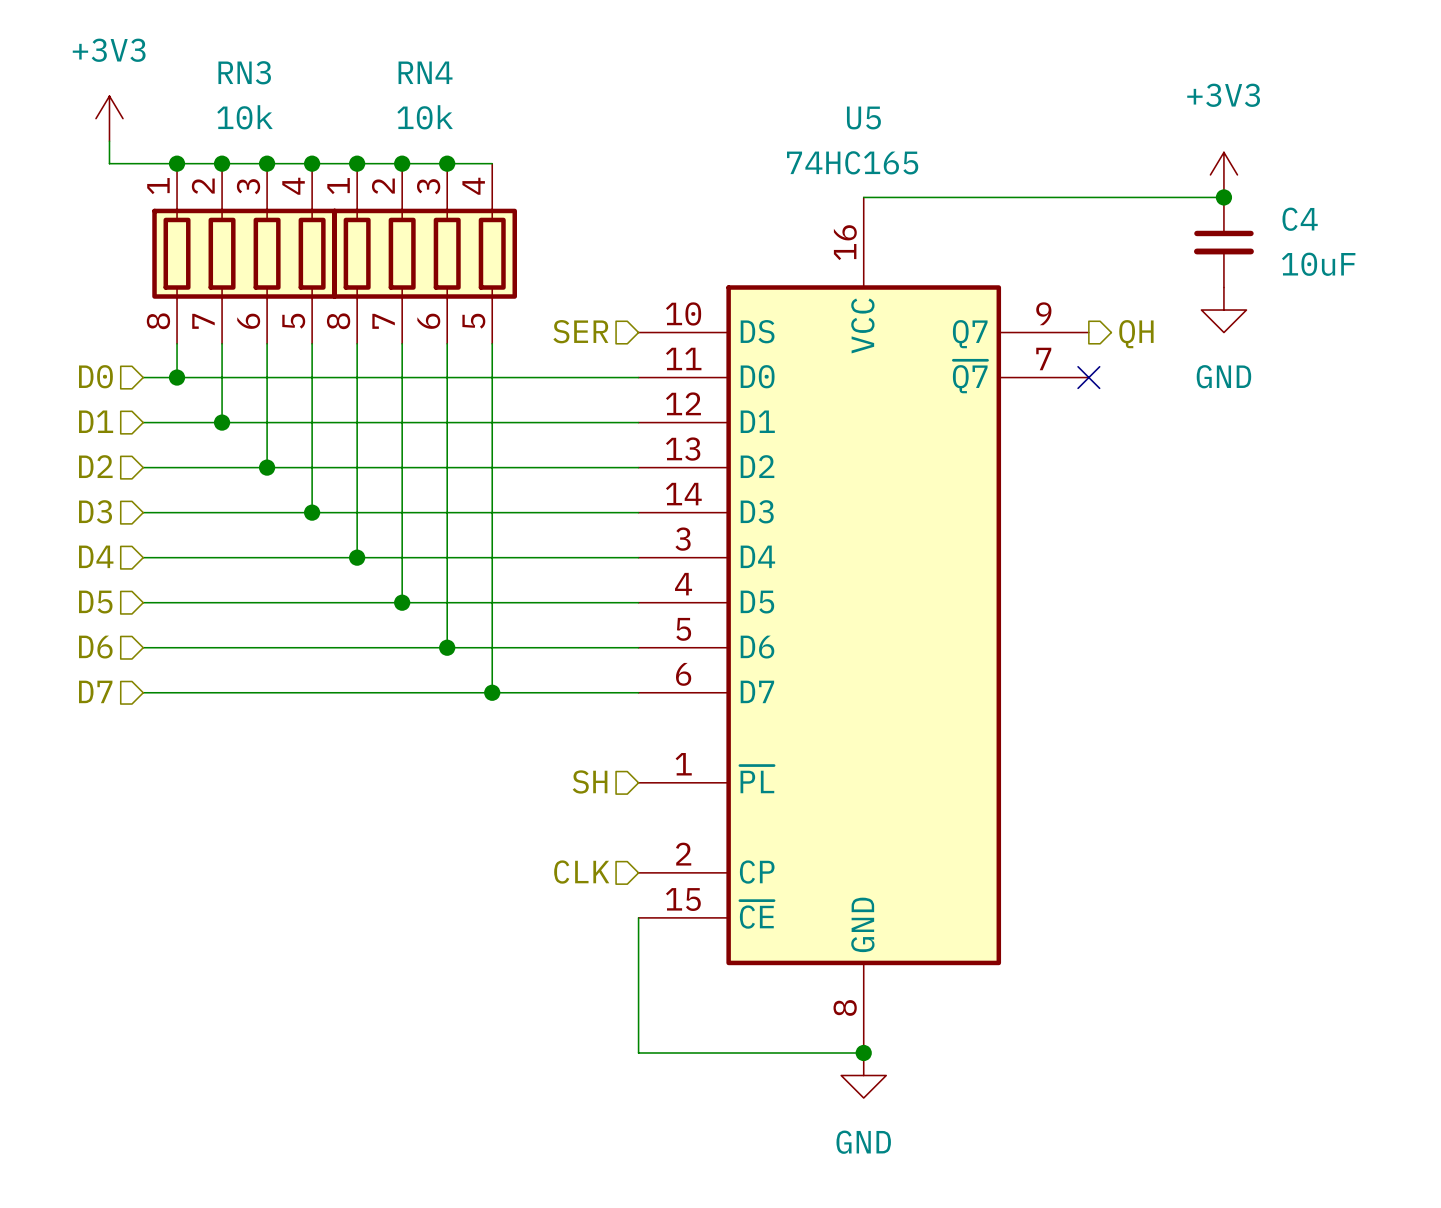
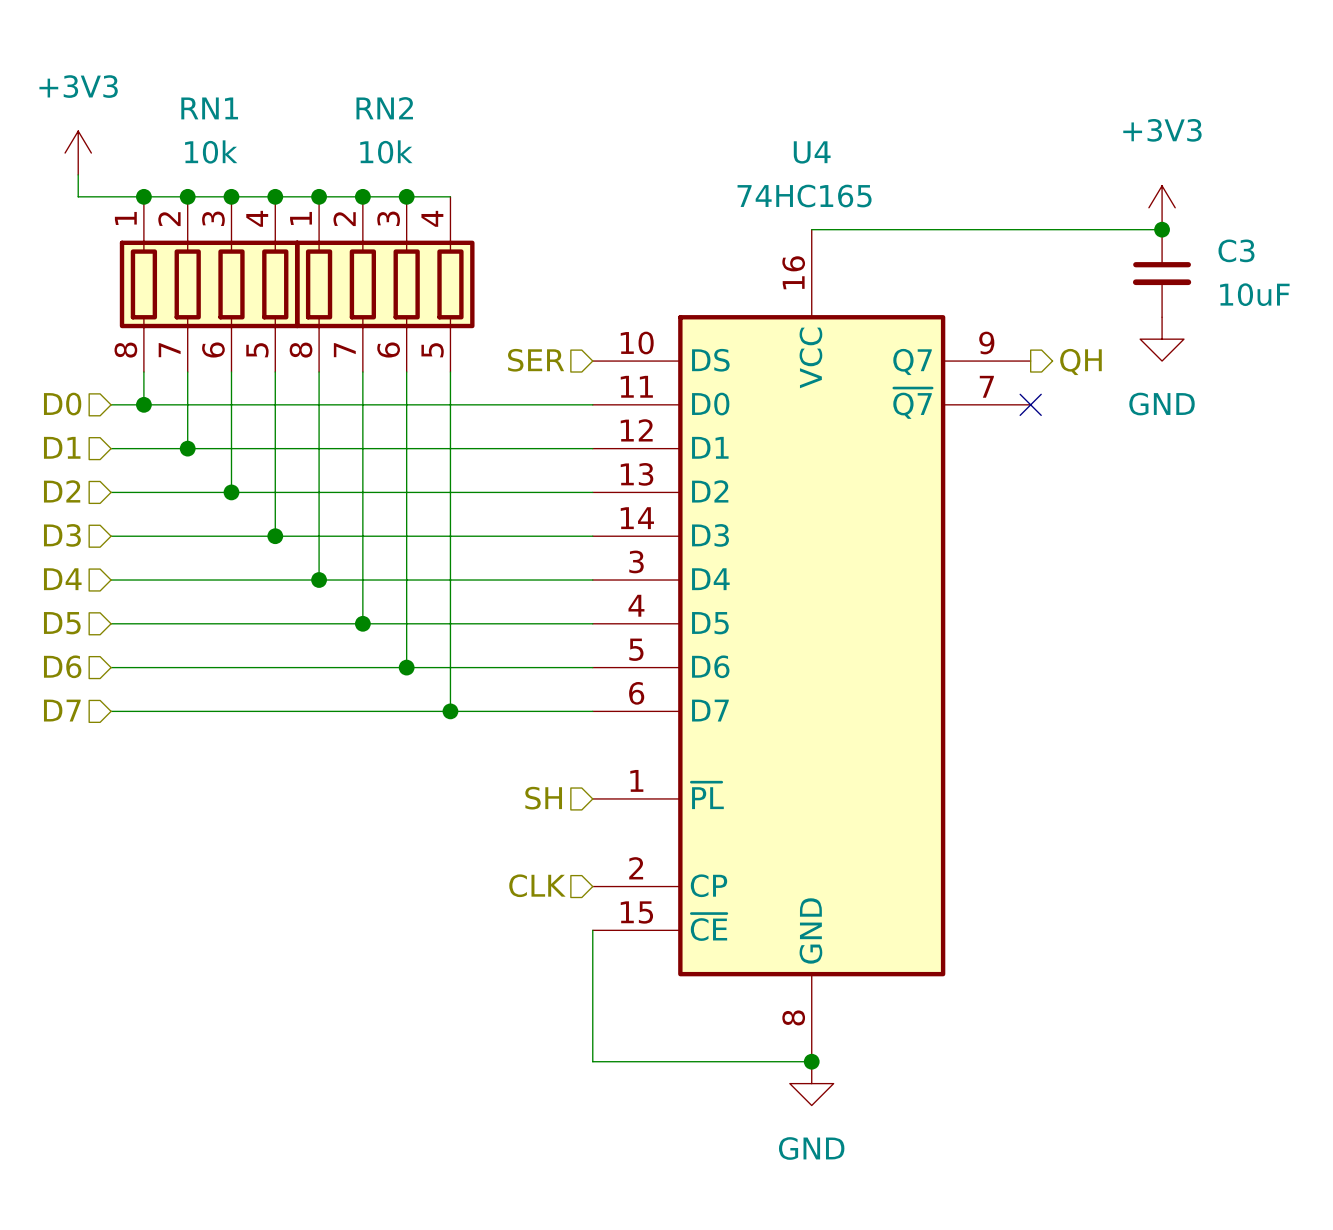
RN3 name: RN3 (244, 72) -> RN1 (209, 108)
RN4 name: RN4 (425, 72) -> RN2 (384, 108)
U5 name: U5 (863, 117) -> U4 (812, 152)
C4 name: C4 (1300, 219) -> C3 (1236, 250)

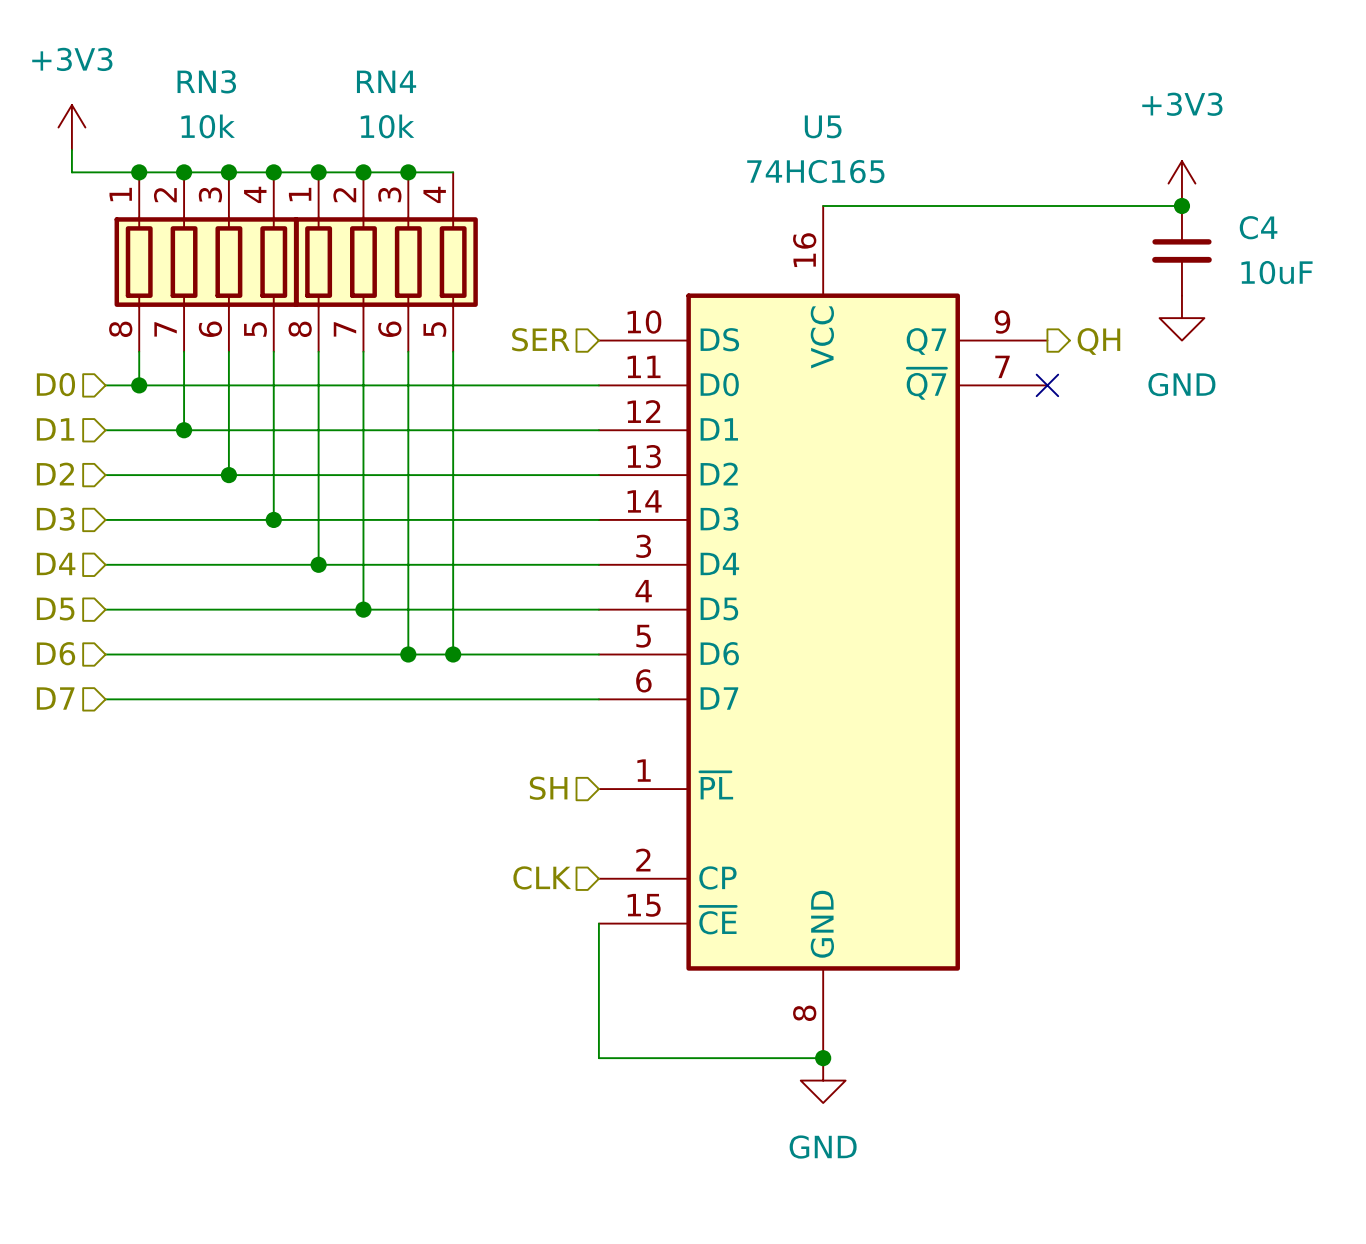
RN1 name: RN1 (209, 108) -> RN3 (206, 81)
RN2 name: RN2 (384, 108) -> RN4 (386, 81)
U4 name: U4 (812, 152) -> U5 (823, 126)
C3 name: C3 (1236, 250) -> C4 (1258, 227)
wire: (450, 667) (450, 711) -> none
junction position: (450, 711) -> (453, 654)

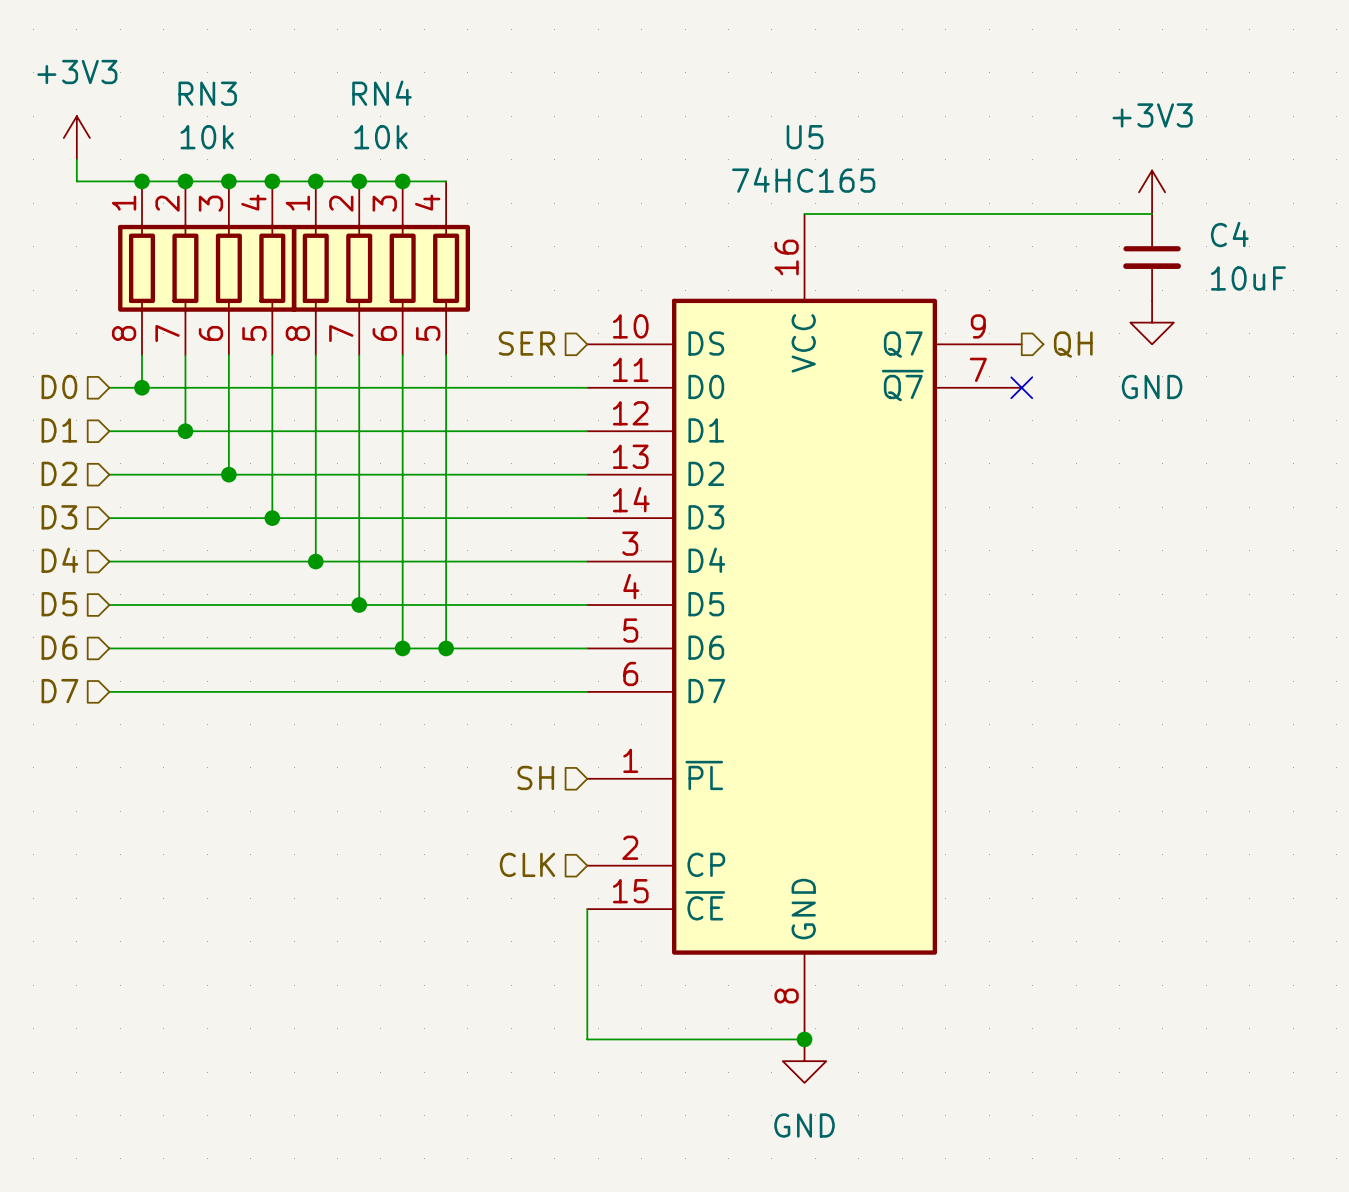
junction: (1181, 206) -> none

